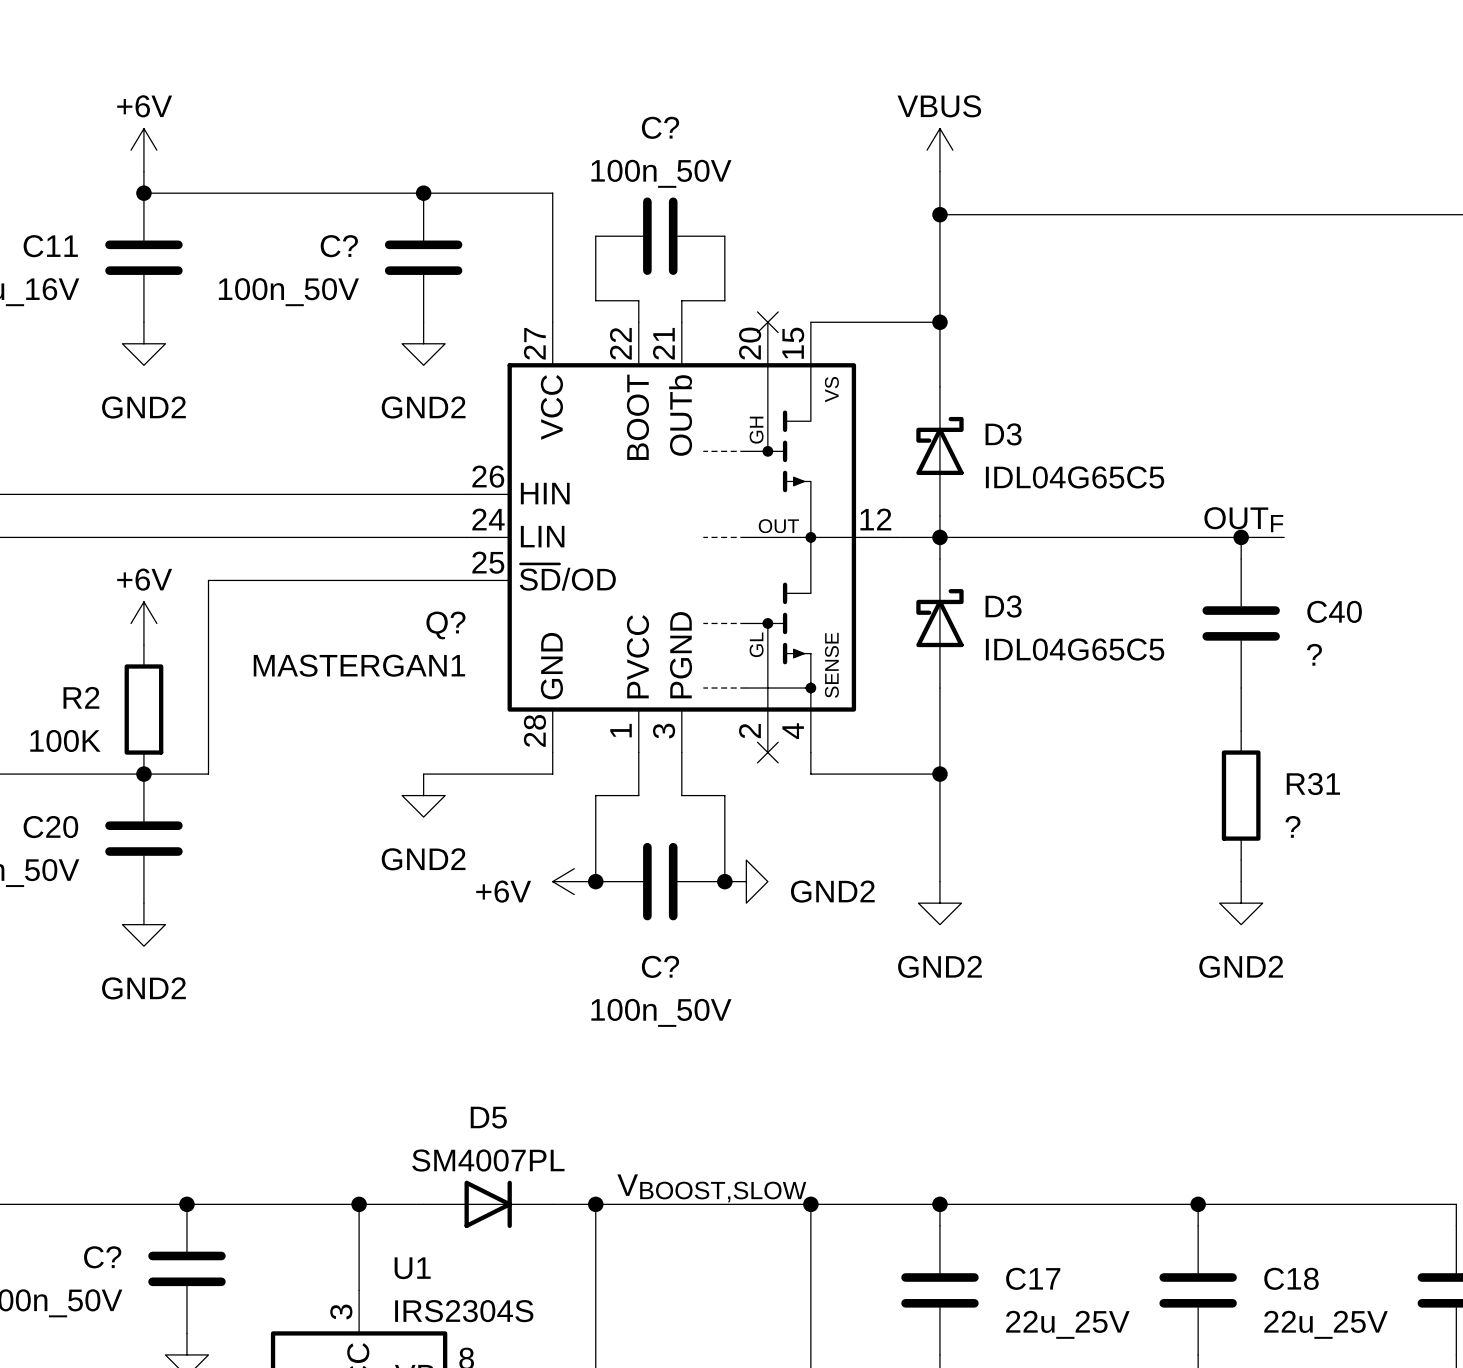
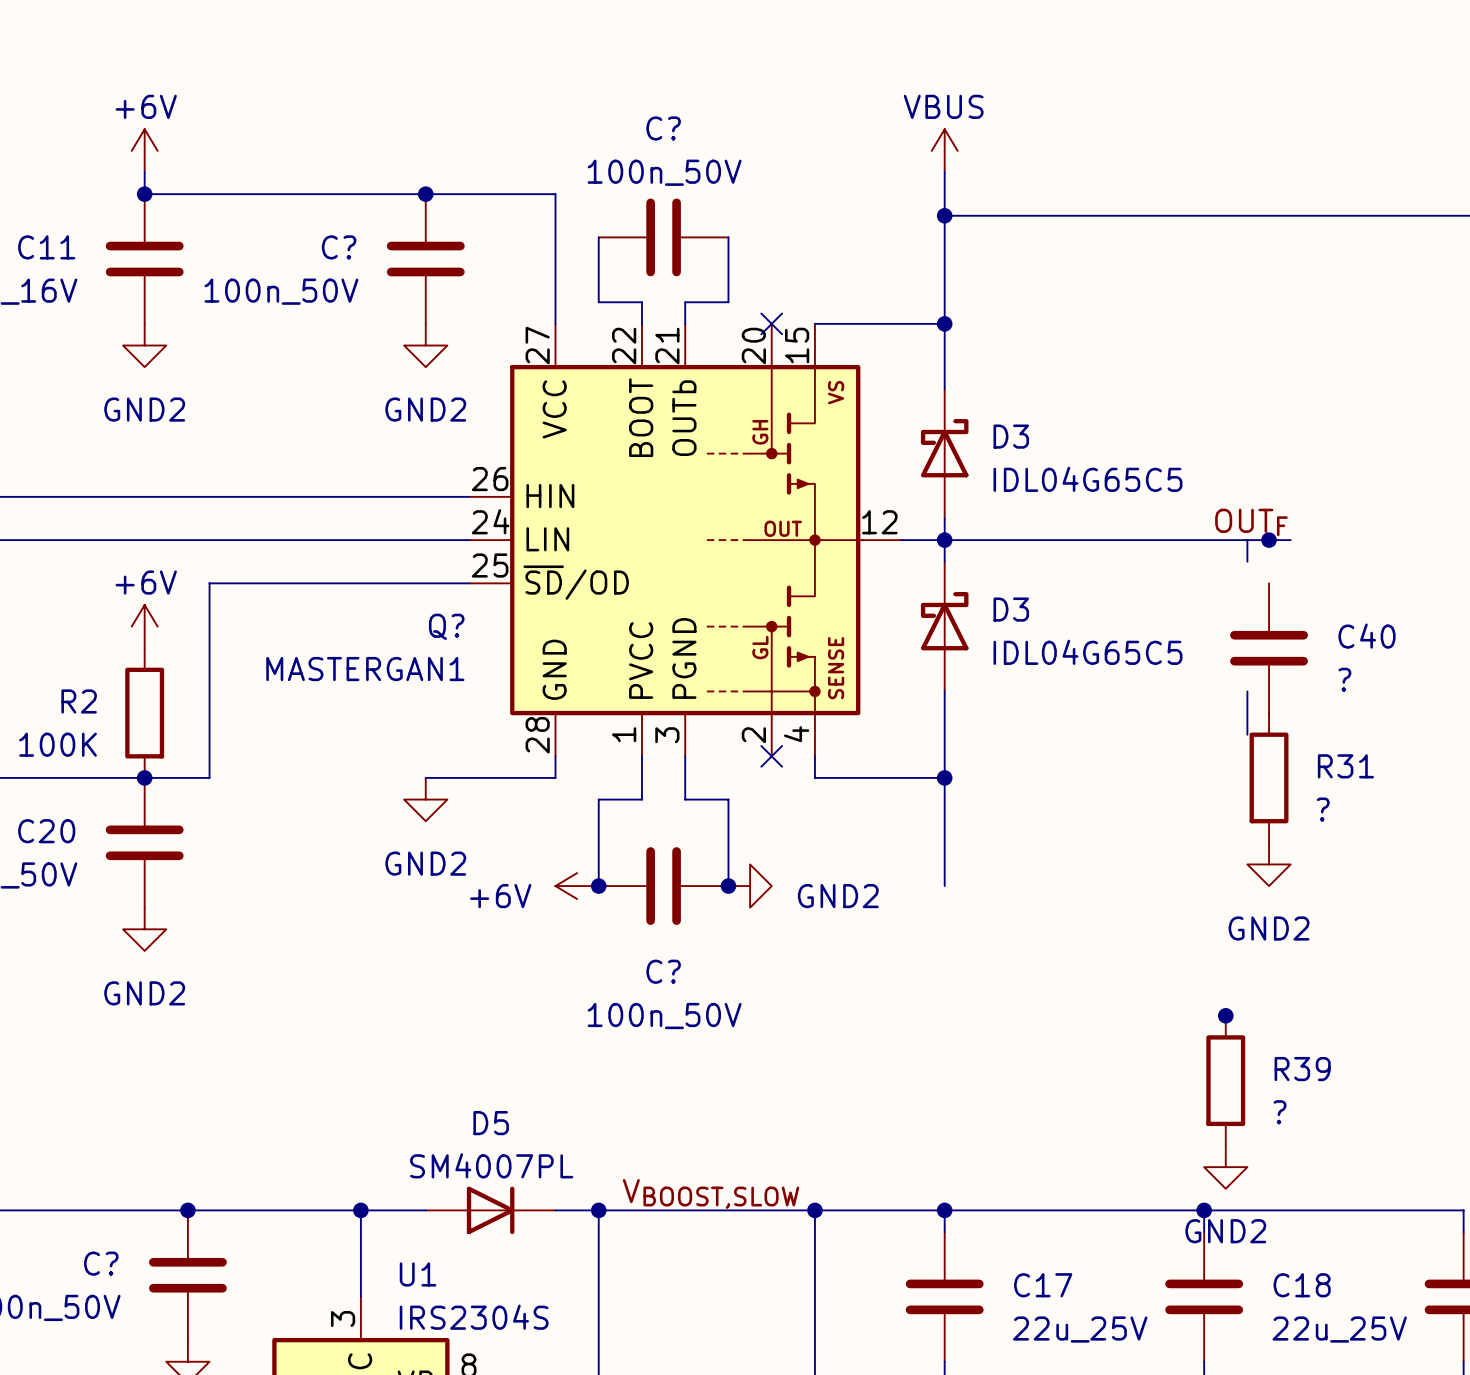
junction position: (1241, 537) -> (1269, 540)
C40 position: (1241, 623) -> (1269, 648)
R31 position: (1241, 795) -> (1269, 777)
wire: (1241, 860) (1241, 881) -> none
power symbol: GND2 (939, 903) -> none
power symbol position: GND2 (1241, 903) -> GND2 (1269, 864)
junction: none -> (1225, 1015)
R39: none -> ? (1225, 1080)
power symbol: none -> GND2 (1225, 1167)

